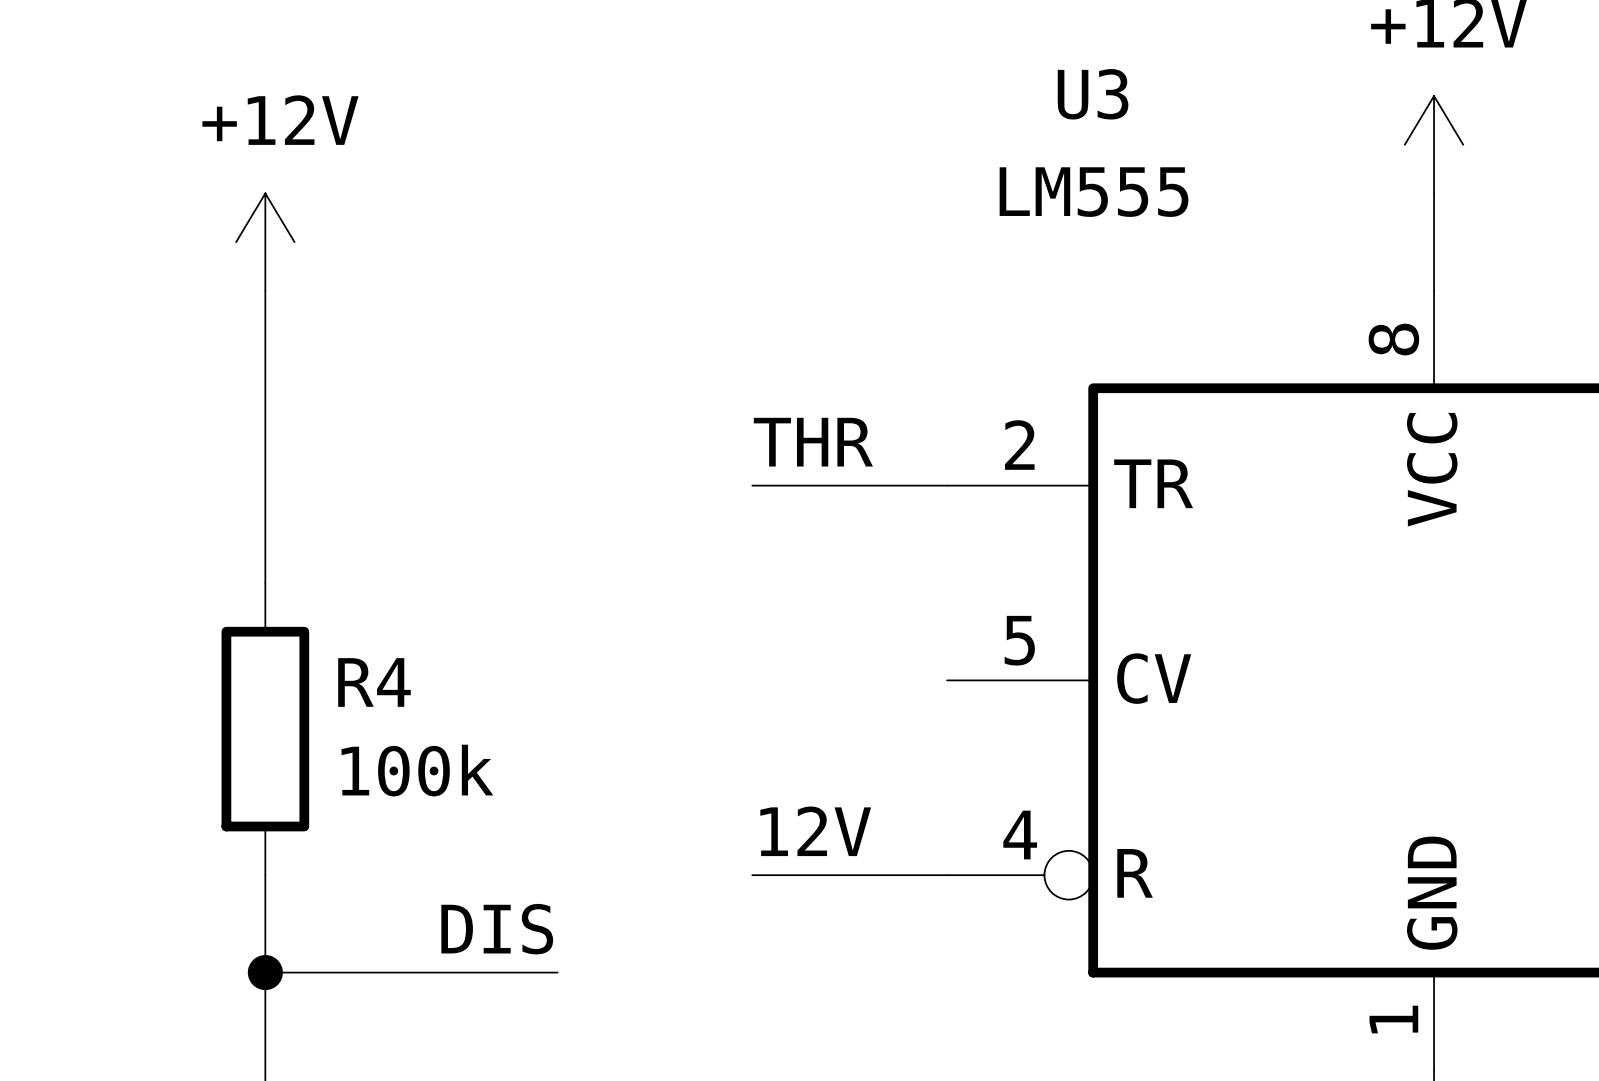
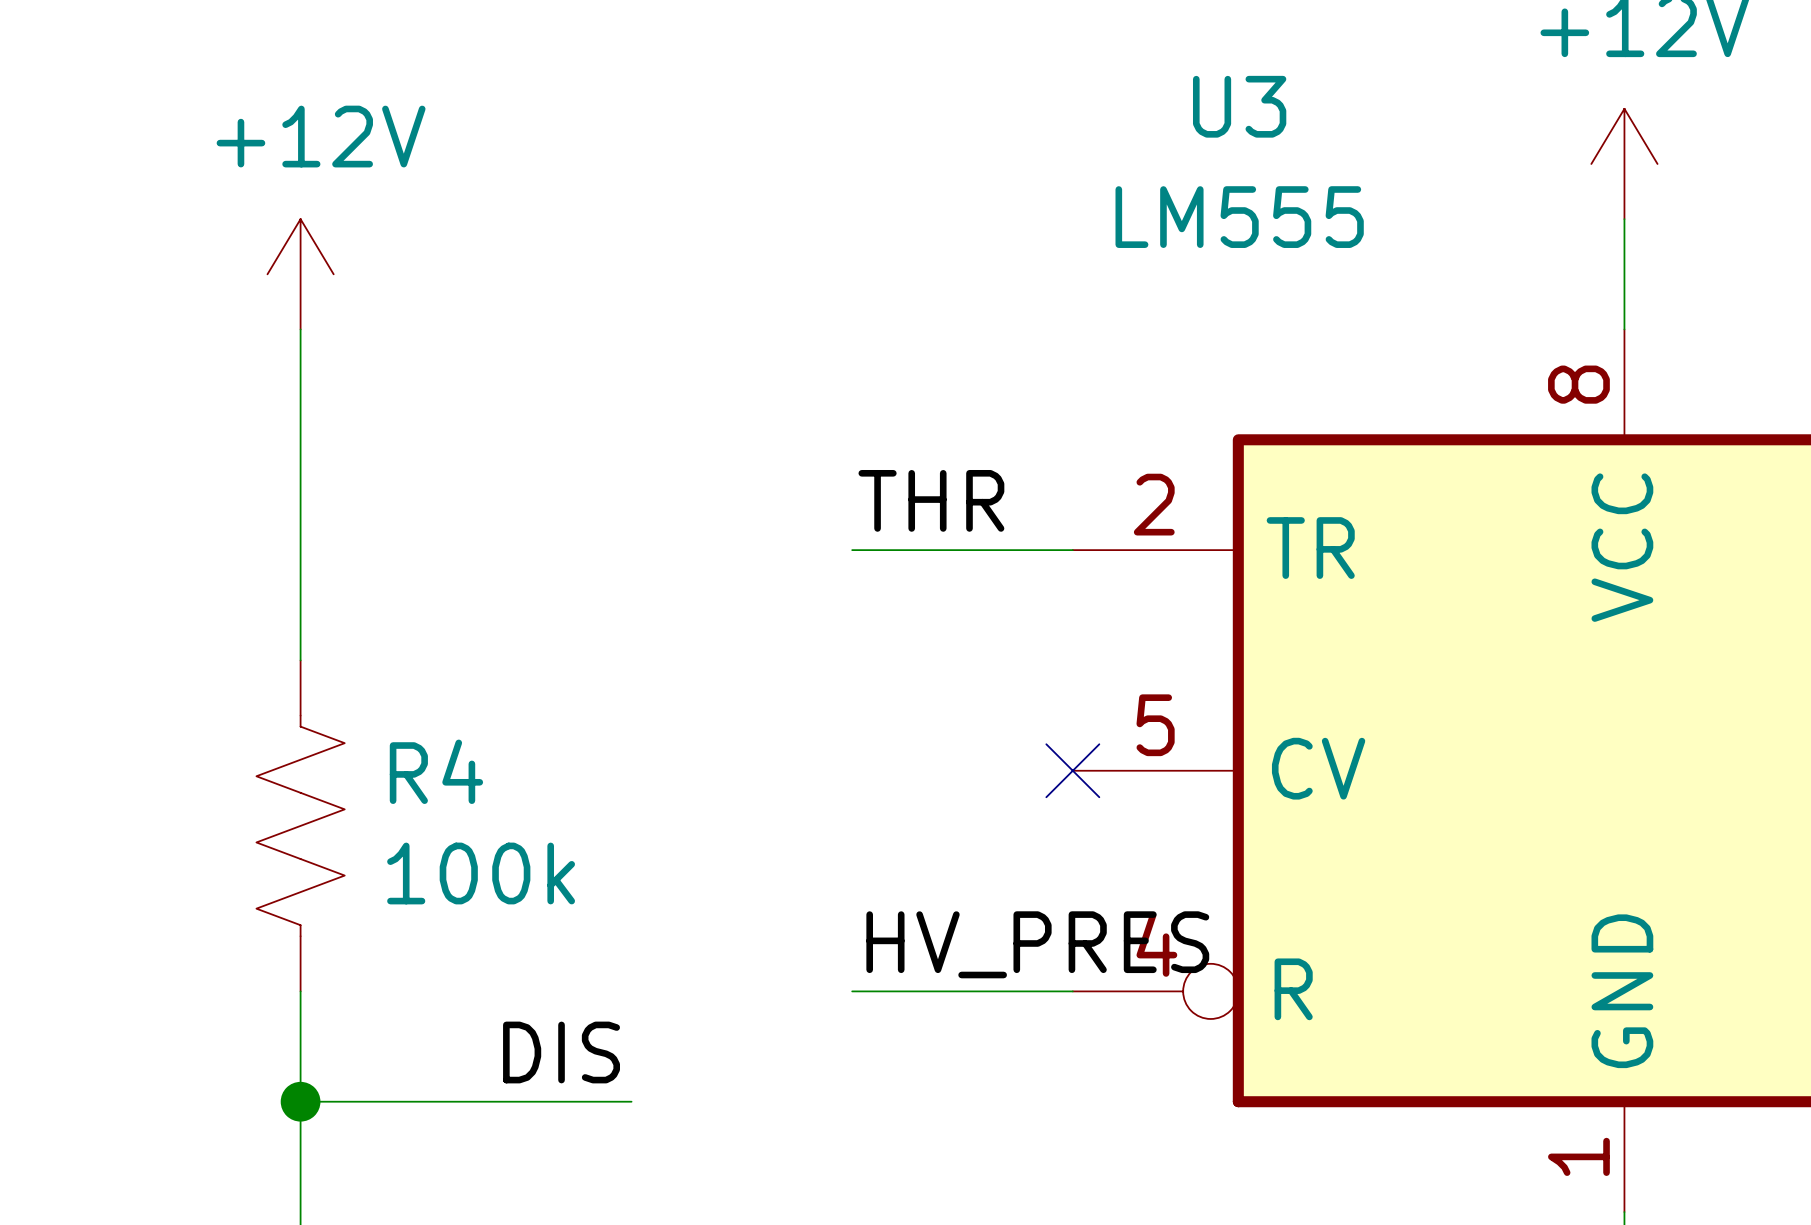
R4 symbol: [221, 583, 310, 876] -> [256, 660, 345, 992]
no-connect mark: none -> (1072, 770)
label: 12V (815, 831) -> HV_PRES (1037, 944)

